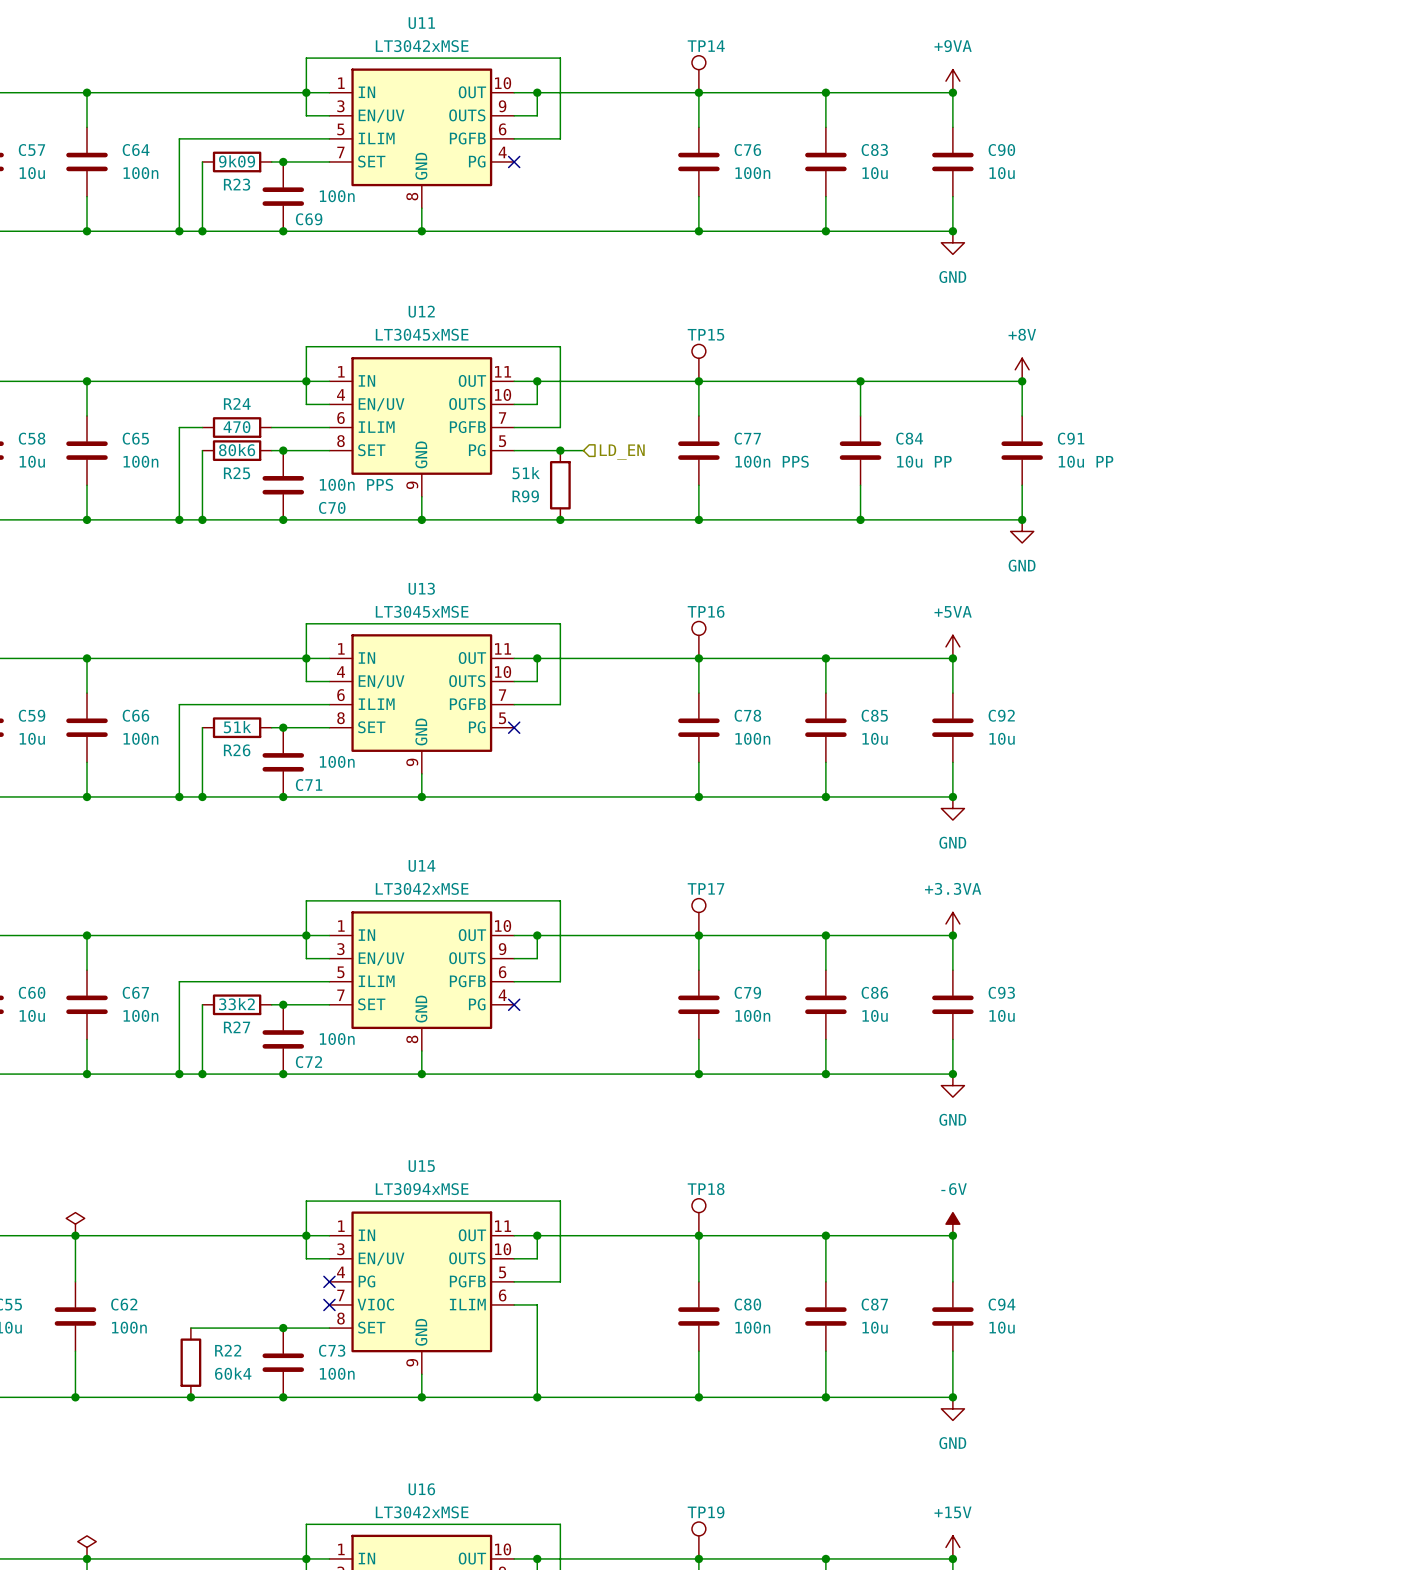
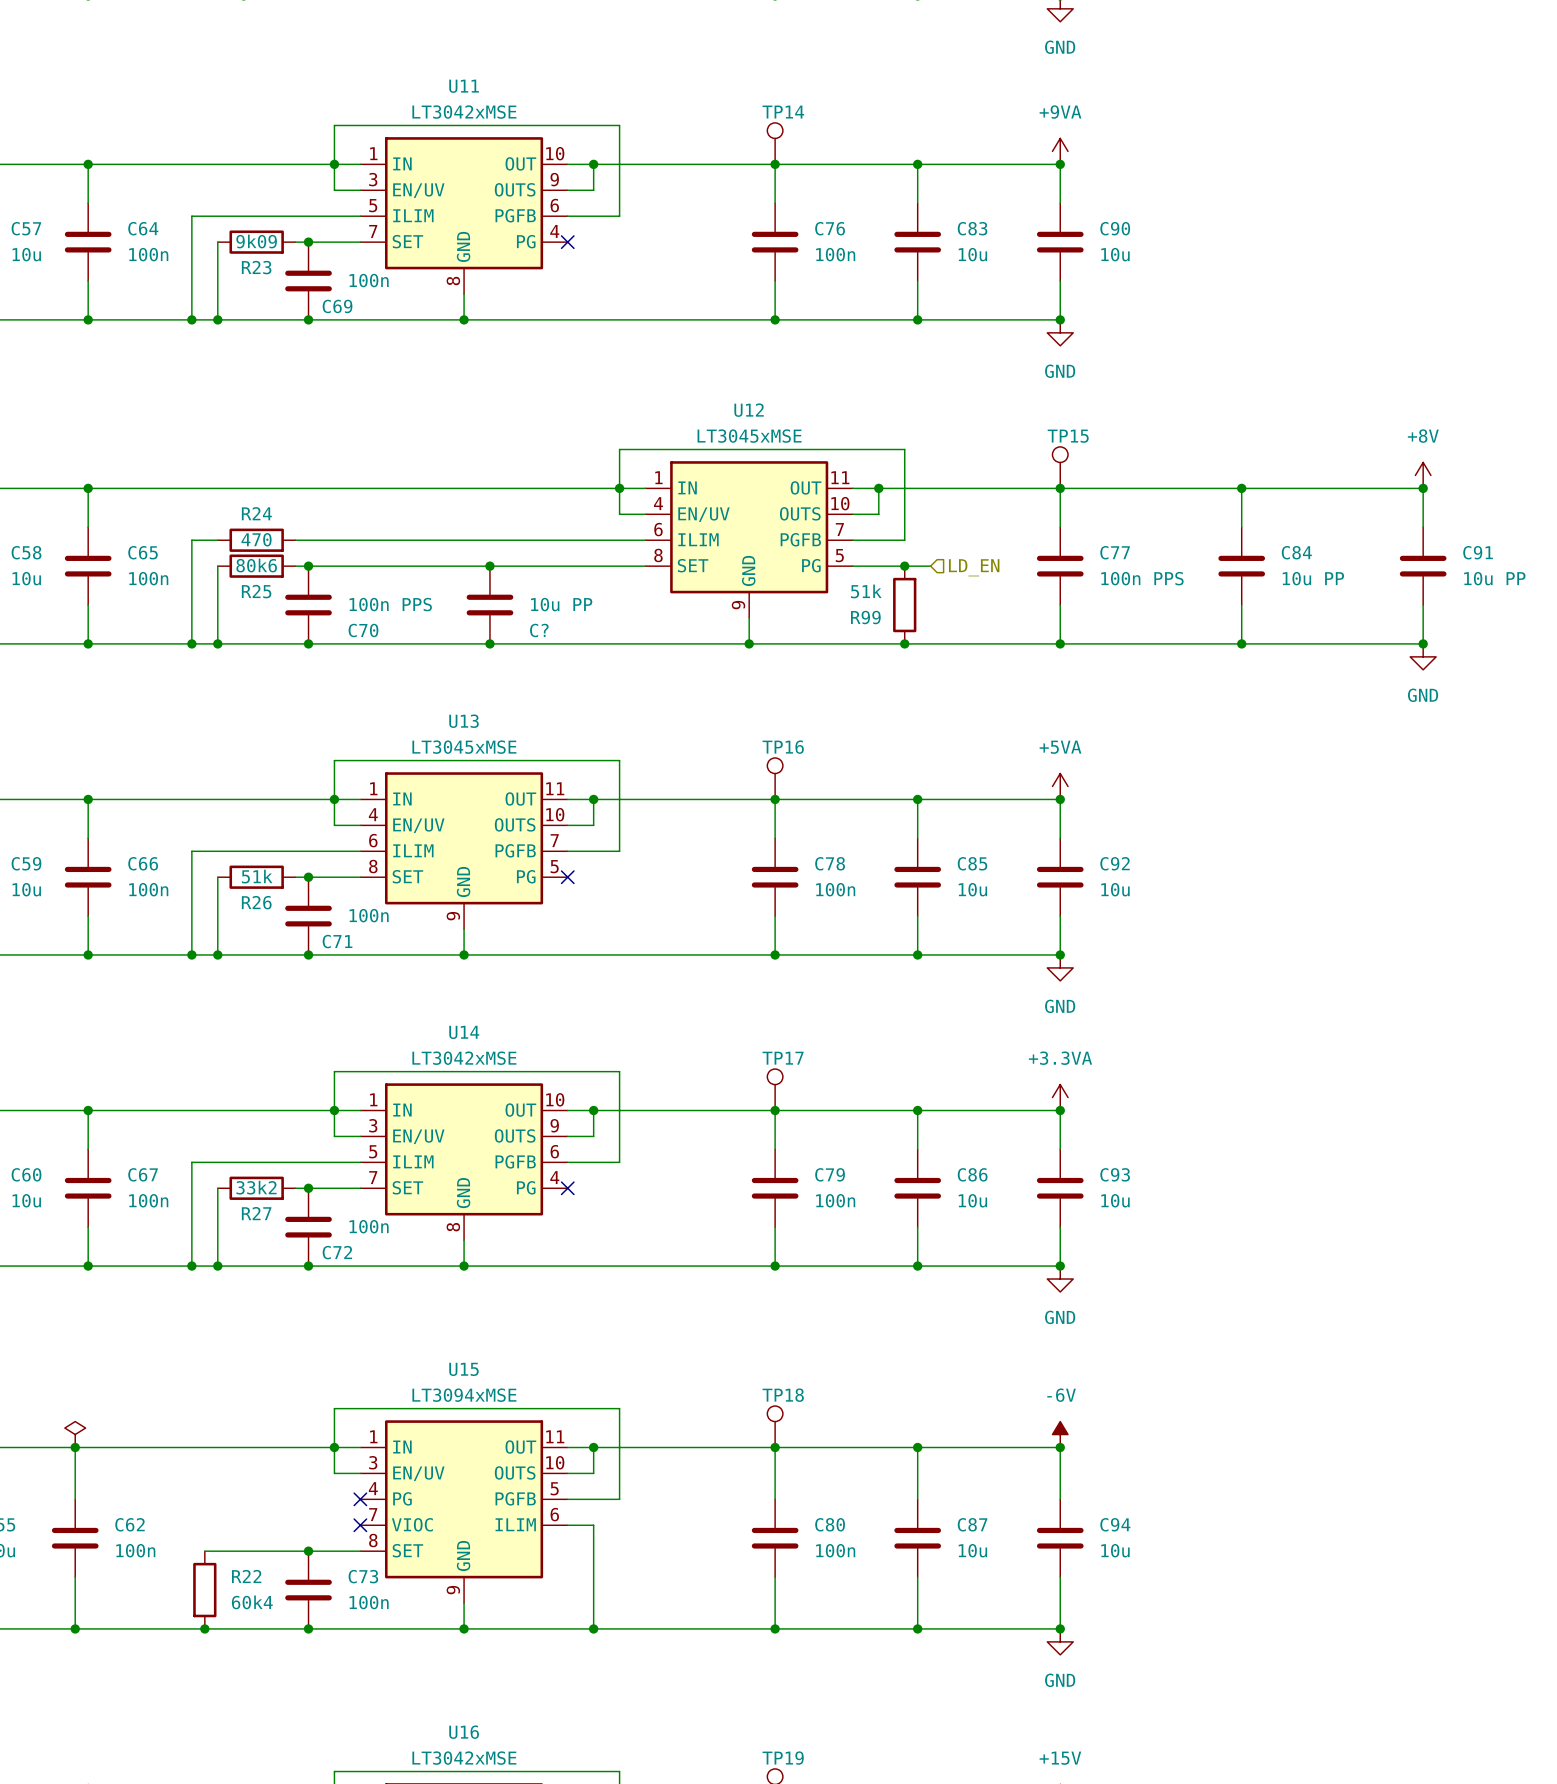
wire: (560, 346) (306, 346) (306, 404) (329, 404) -> (619, 449) (904, 449) (904, 540) (852, 540)
TP15 position: (698, 362) -> (1060, 467)
power symbol: +8V (1022, 369) -> none
power symbol: none -> +8V (1423, 475)
junction: (306, 381) -> none
wire: (537, 381) (537, 404) (514, 404) -> none
junction position: (537, 381) -> (619, 488)
junction: (698, 381) -> none
wire: none -> (878, 488) (878, 514) (852, 514)
junction: none -> (878, 488)
wire: (860, 381) (860, 415) -> (1060, 488) (1060, 527)
junction: (860, 381) -> none
junction: none -> (1060, 488)
wire: (1022, 381) (1022, 415) -> (1138, 488) (1423, 488) (1423, 527)
junction: (1022, 381) -> none
wire: none -> (1241, 488) (1241, 527)
junction: none -> (1241, 488)
junction: none -> (1423, 488)
wire: (560, 404) (560, 427) -> (619, 514) (645, 514)
U12 position: (421, 426) -> (749, 539)
wire: none -> (619, 540) (645, 540)
junction: none -> (489, 566)
junction: (560, 450) -> none
C77 position: (698, 450) -> (1060, 566)
wire: none -> (852, 566) (930, 566)
junction: none -> (904, 566)
C84 position: (860, 450) -> (1241, 566)
C91 position: (1022, 450) -> (1423, 566)
hierarchical label: LD_EN (622, 452) -> none
hierarchical label: none -> LD_EN (974, 567)
C?: none -> 10u PP (489, 605)
R99 position: (560, 485) -> (904, 605)
wire: (698, 485) (698, 519) -> none
wire: (860, 485) (860, 519) -> (1060, 605) (1060, 643)
wire: (1022, 485) (1022, 519) -> (1423, 605) (1423, 643) (1138, 643)
wire: none -> (1241, 605) (1241, 643)
wire: (421, 496) (421, 519) -> none
wire: none -> (749, 618) (749, 643)
junction position: (421, 519) -> (489, 643)
junction: (560, 519) -> none
junction position: (698, 519) -> (749, 643)
junction: none -> (904, 643)
junction: (860, 519) -> none
junction: none -> (1060, 643)
junction: (1022, 519) -> none
junction: none -> (1241, 643)
junction: none -> (1423, 643)
power symbol: GND (1022, 531) -> none
power symbol: none -> GND (1423, 656)

